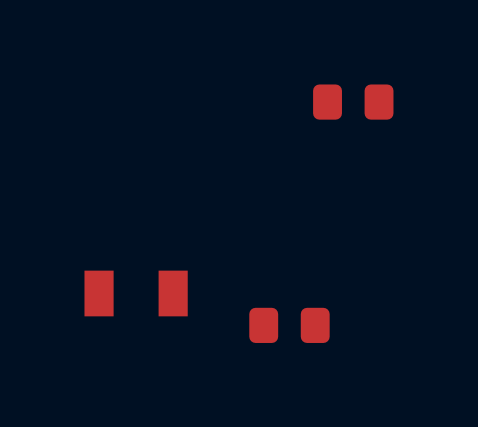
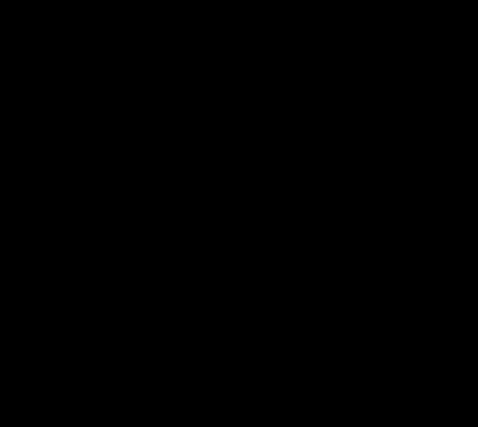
part: (353, 102) -> none
part: (136, 293) -> none
part: (289, 325) -> none

